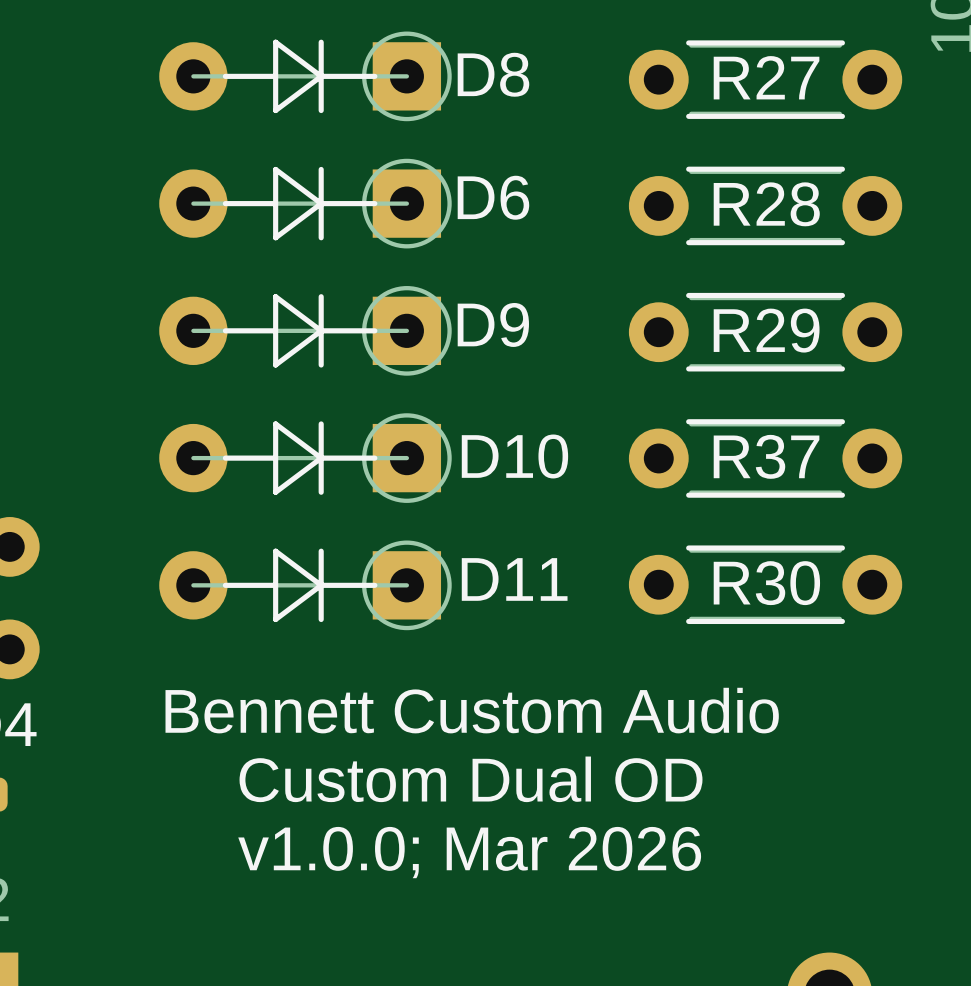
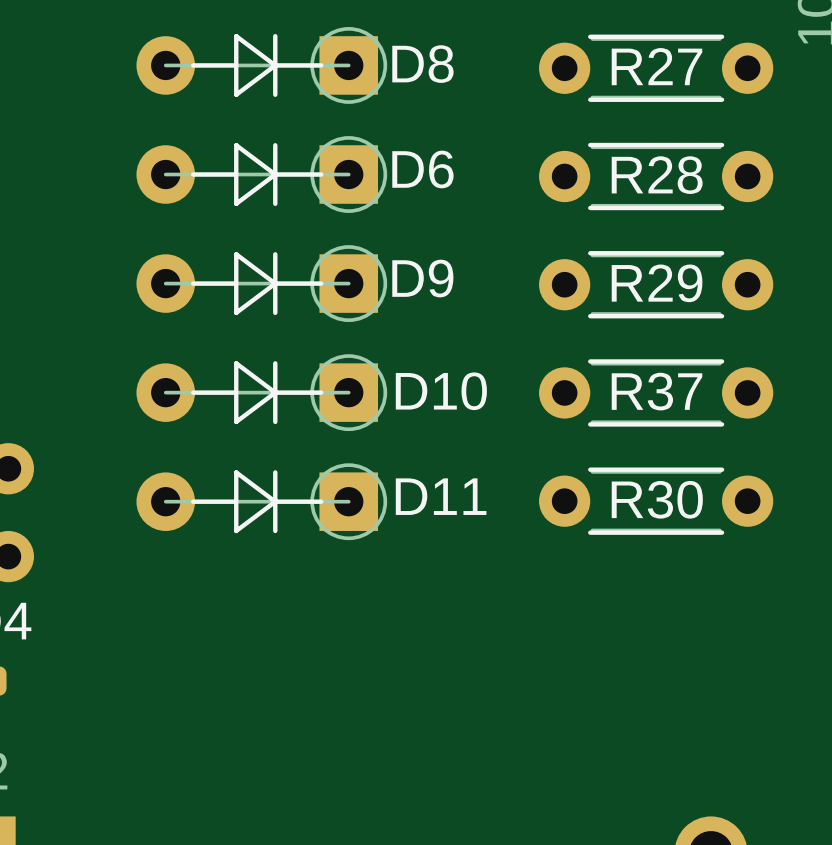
text: Bennett Custom Audio (472, 710) -> none
text: Custom Dual OD (471, 779) -> none
text: v1.0.0; Mar 2026 (469, 852) -> none

